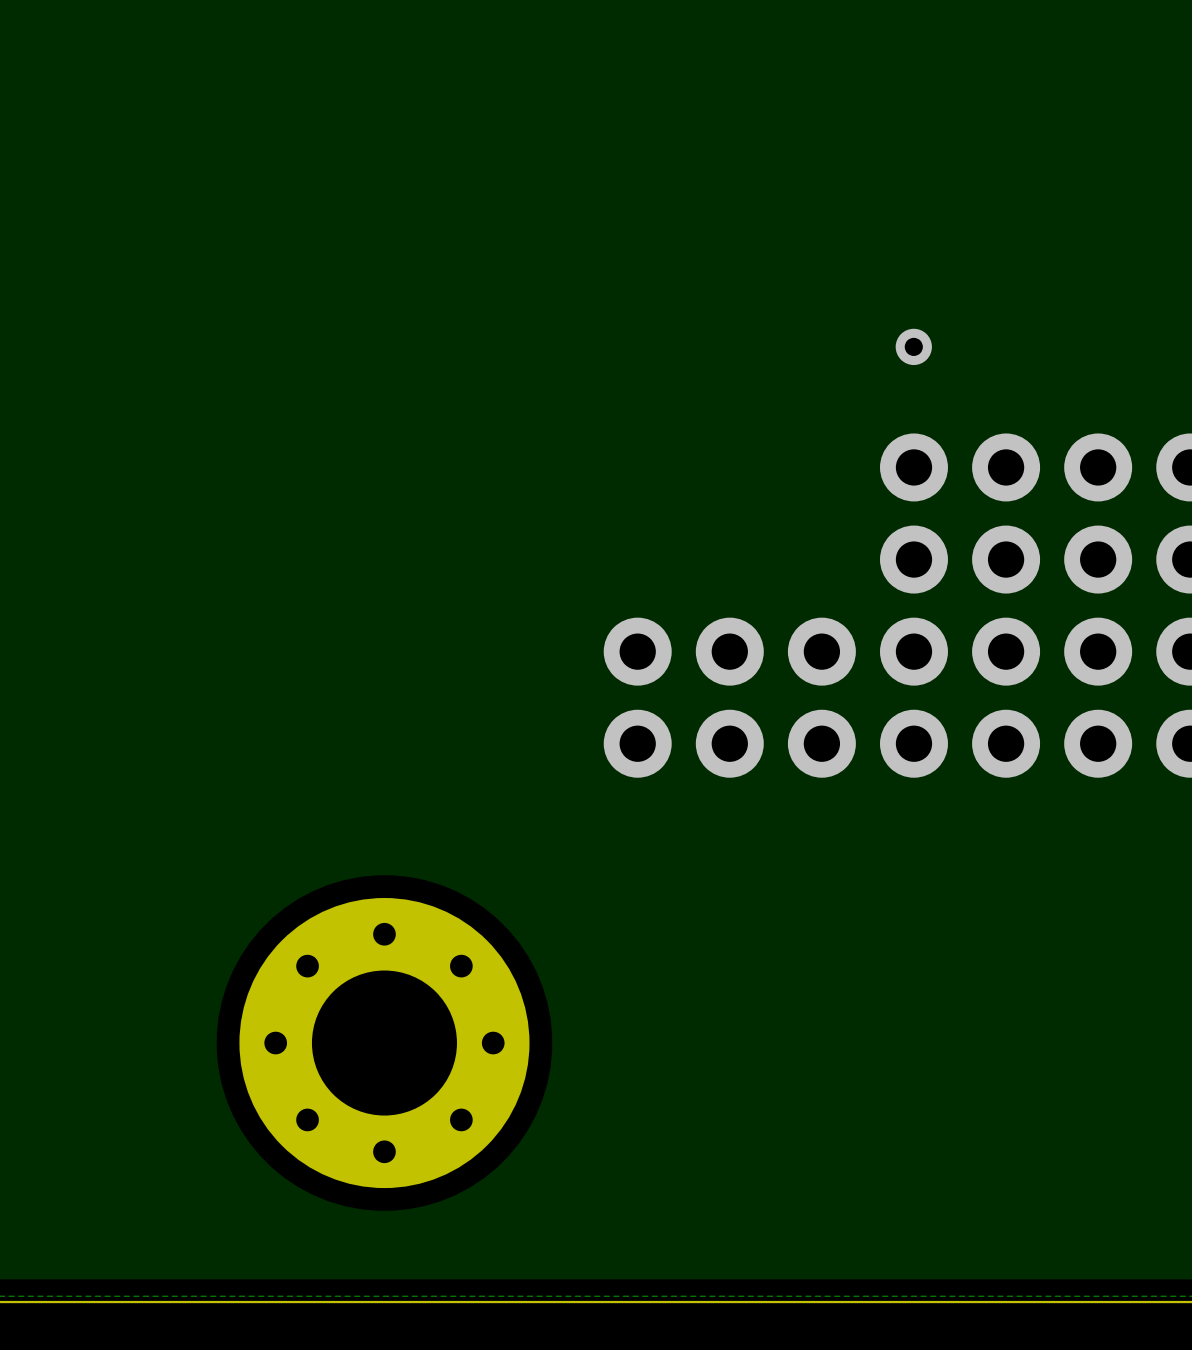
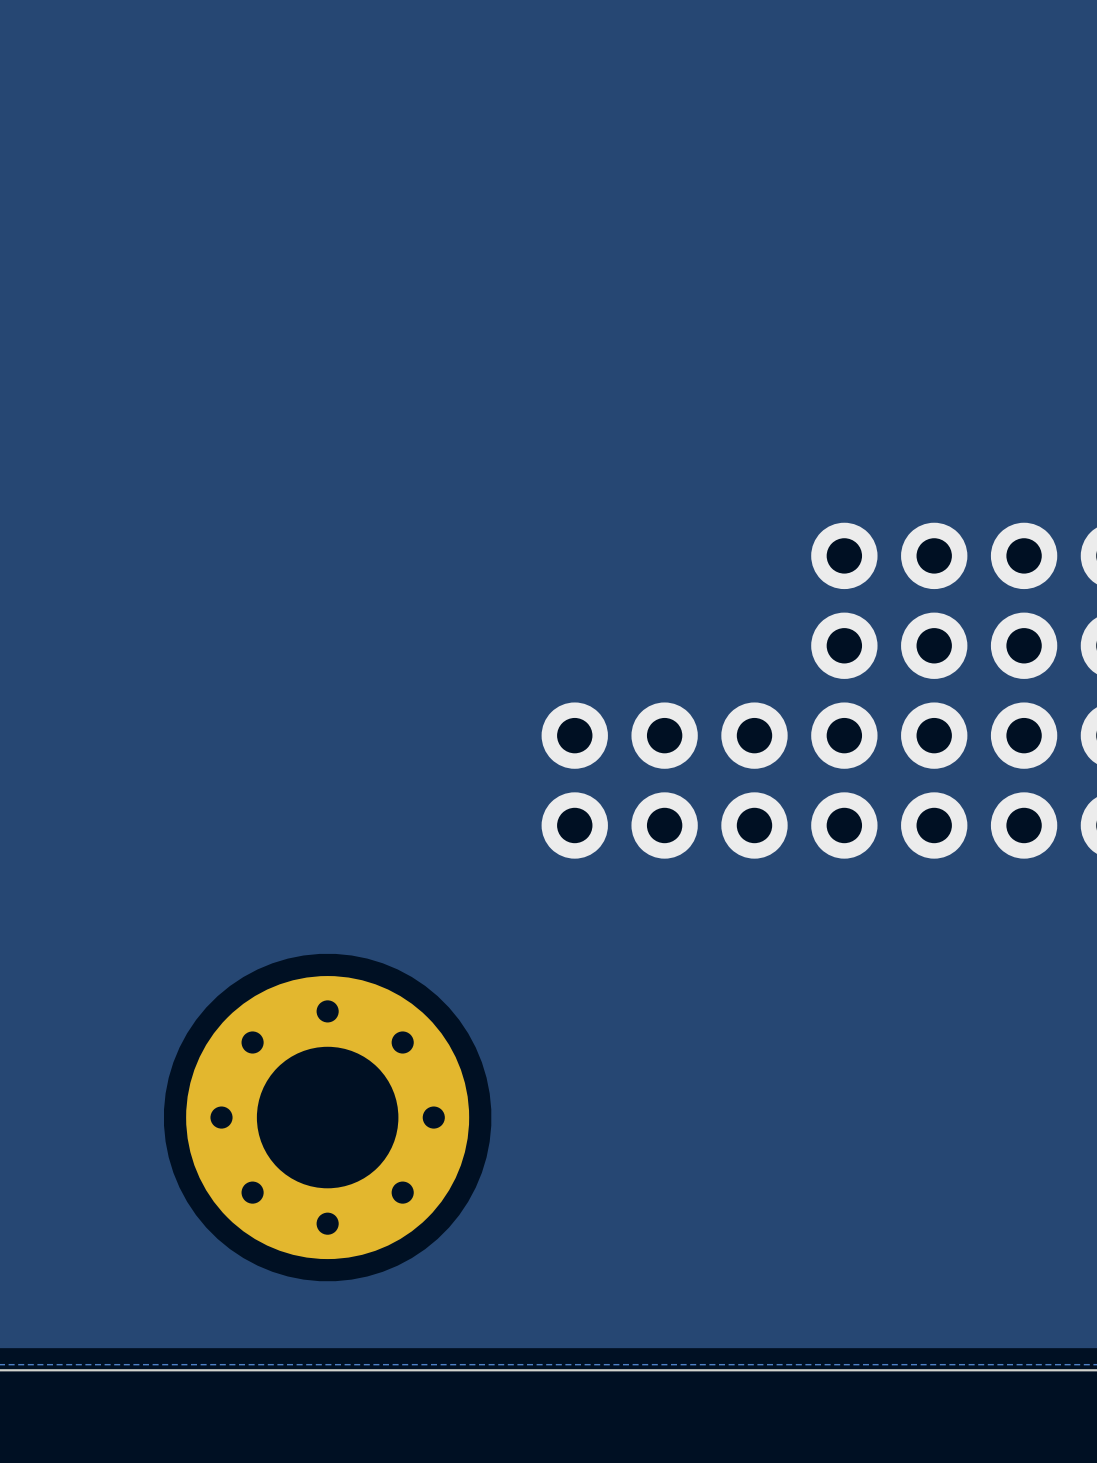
via: (913, 346) -> none

